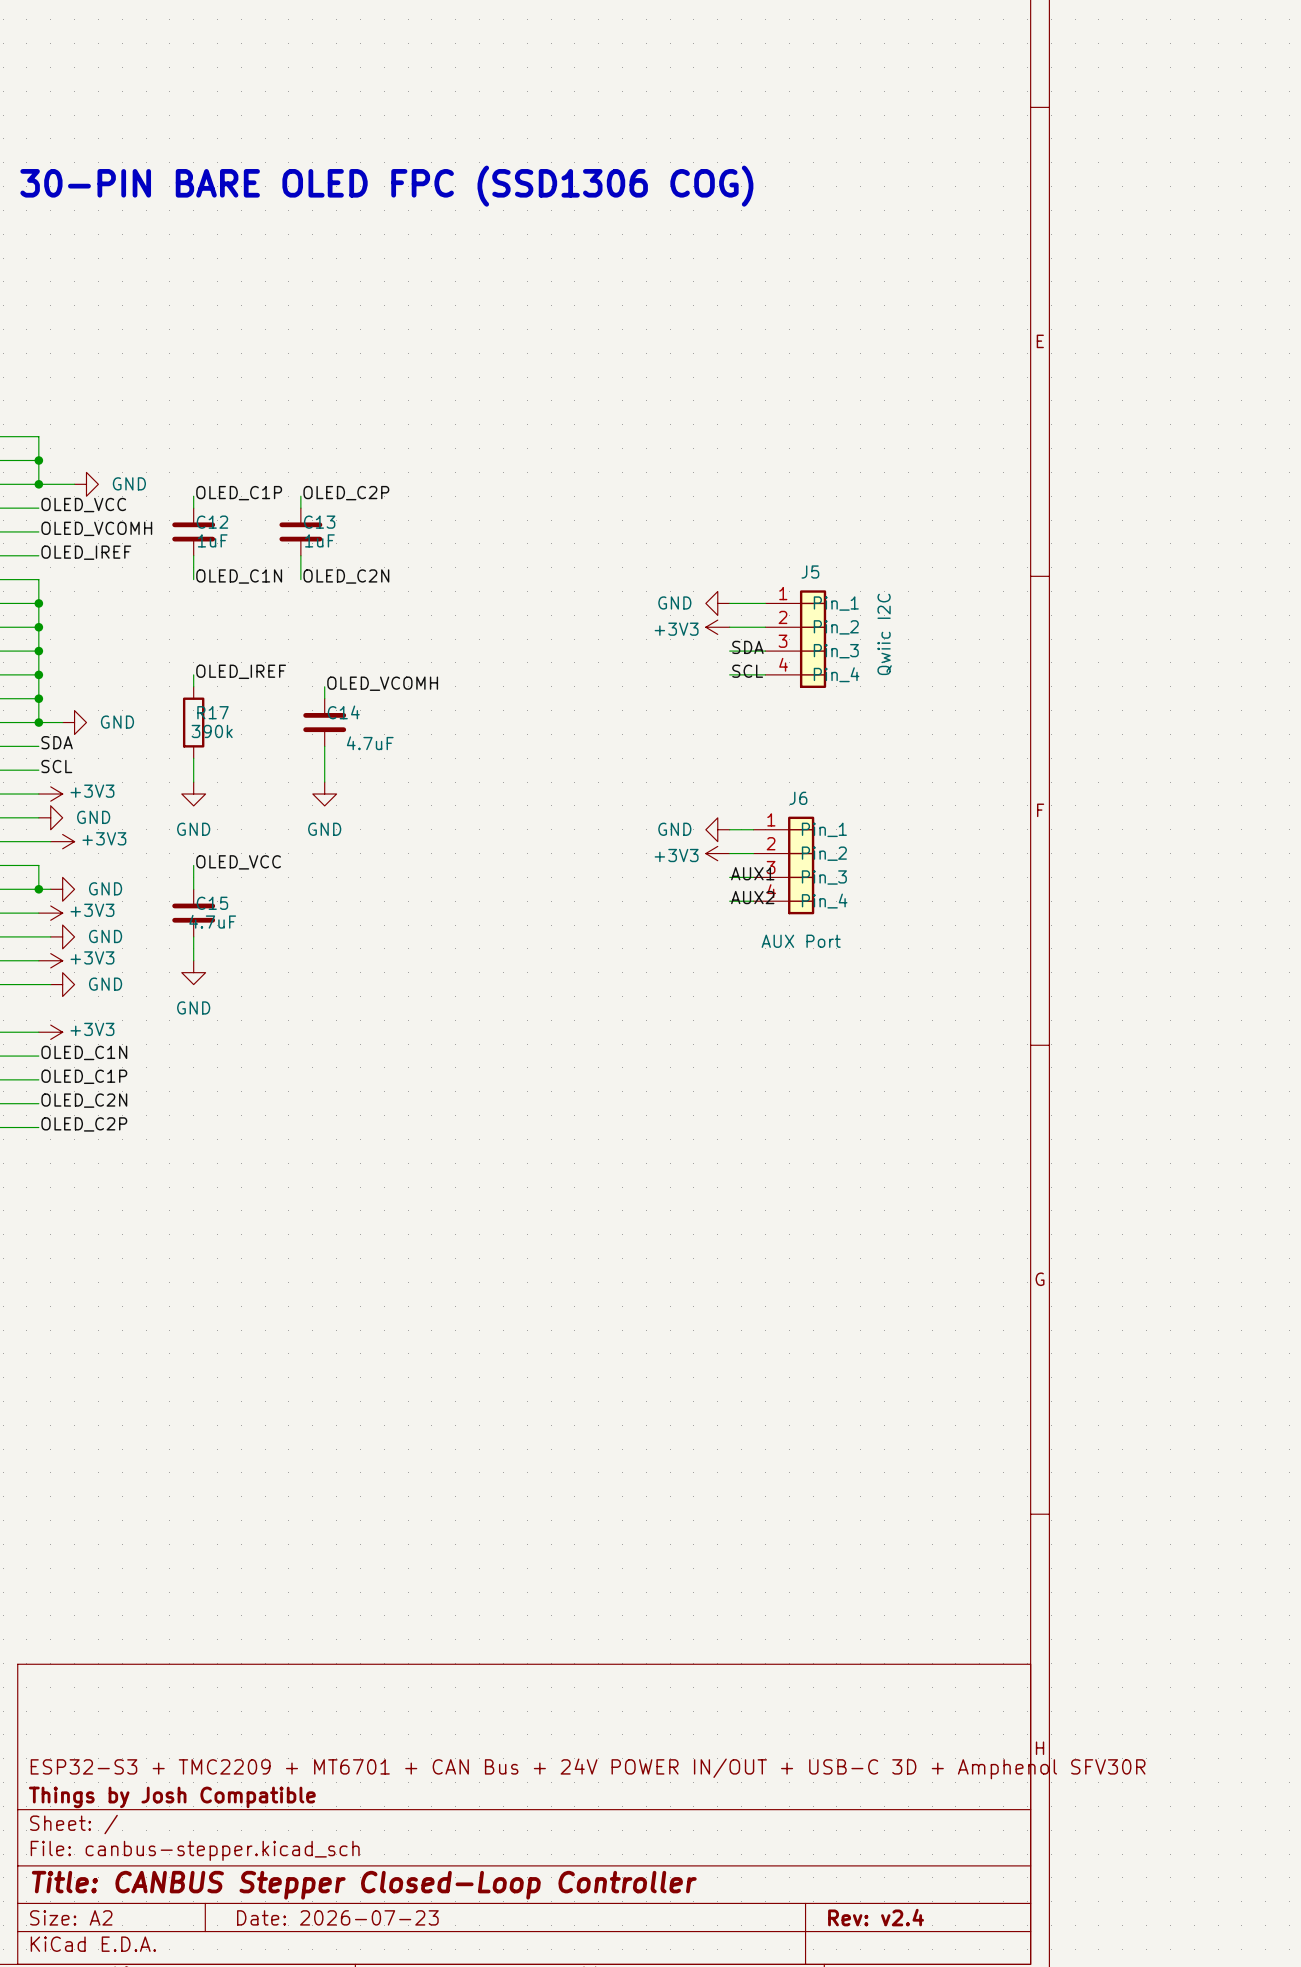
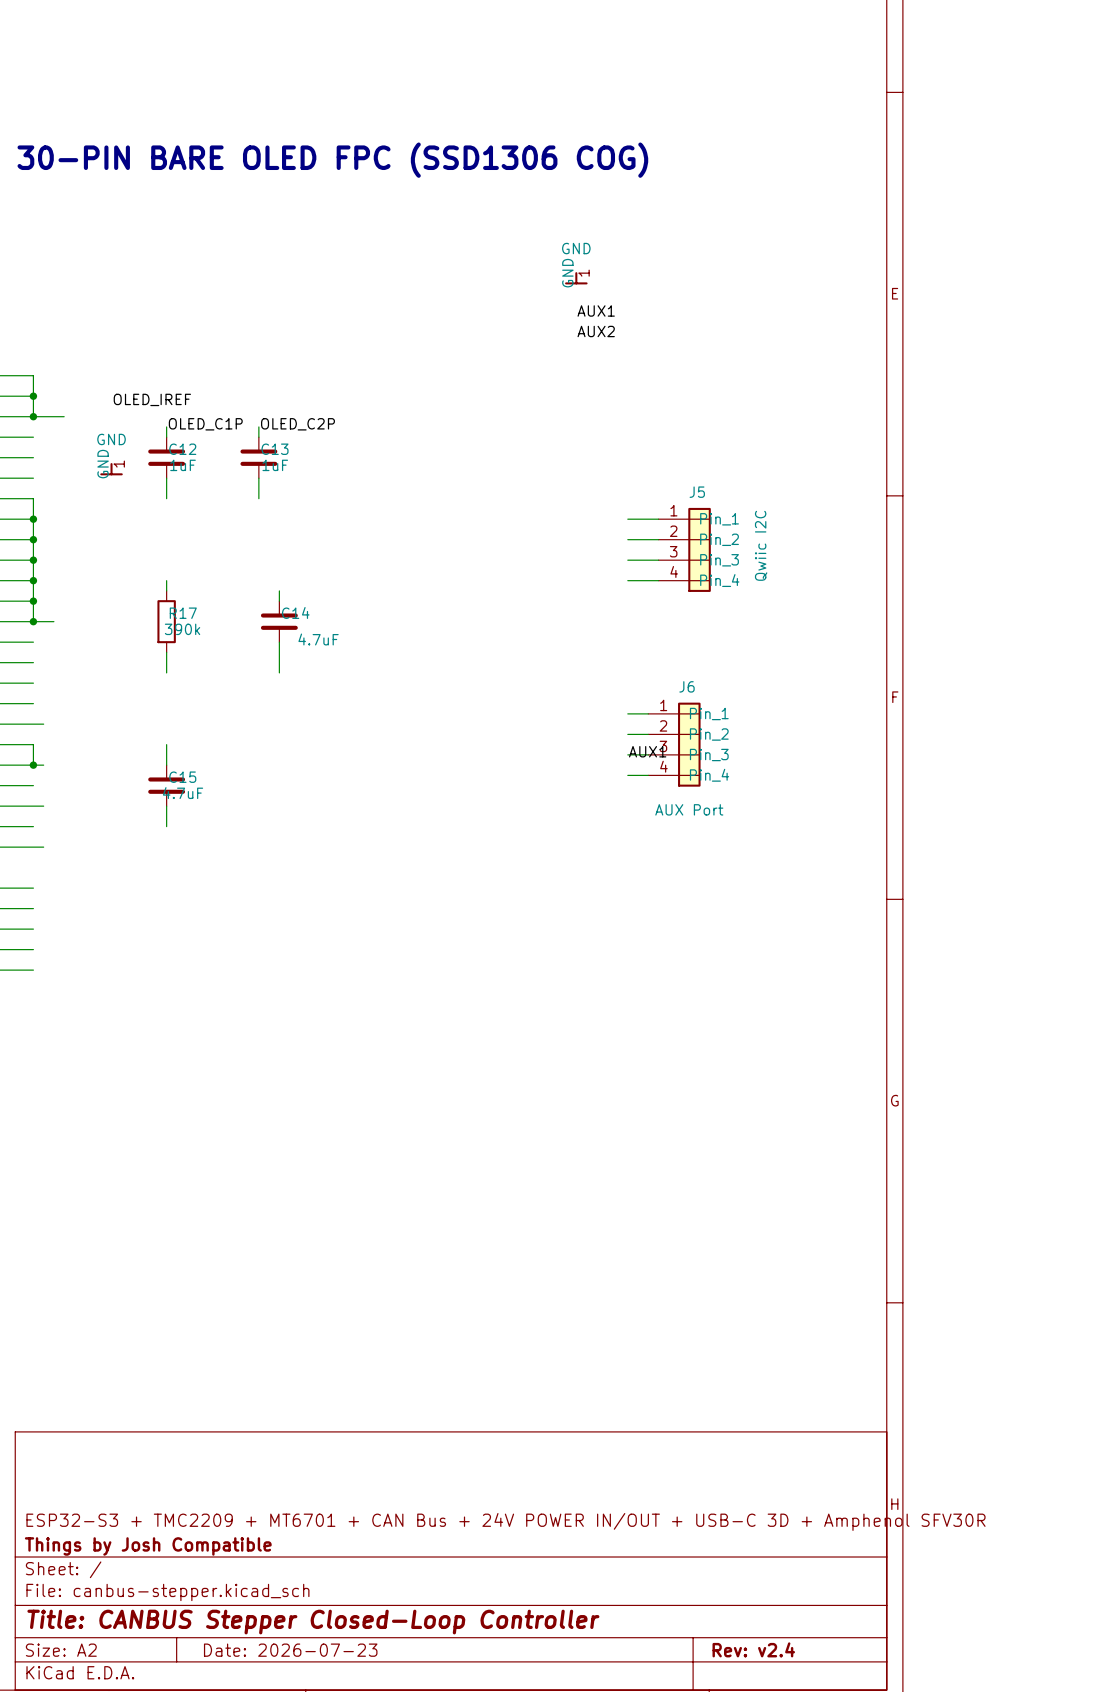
power symbol: none -> GND (576, 278)
label: none -> AUX1 (596, 310)
label: none -> AUX2 (596, 331)
label: none -> OLED_IREF (152, 399)
power symbol: GND (86, 484) -> none
label: OLED_VCC (83, 505) -> none
label: OLED_VCOMH (96, 528) -> none
power symbol: none -> GND (111, 469)
label: OLED_IREF (86, 552) -> none
label: OLED_C1N (239, 576) -> none
label: OLED_C2N (346, 576) -> none
power symbol: GND (717, 603) -> none
power symbol: +3V3 (717, 627) -> none
label: SDA (747, 647) -> none
label: OLED_IREF (241, 671) -> none
label: SCL (747, 671) -> none
label: OLED_VCOMH (382, 683) -> none
power symbol: GND (74, 722) -> none
label: SDA (57, 742) -> none
label: SCL (56, 766) -> none
power symbol: +3V3 (50, 794) -> none
power symbol: GND (193, 794) -> none
power symbol: GND (324, 794) -> none
power symbol: GND (50, 817) -> none
power symbol: GND (717, 829) -> none
power symbol: +3V3 (62, 841) -> none
power symbol: +3V3 (717, 853) -> none
label: OLED_VCC (238, 862) -> none
power symbol: GND (62, 889) -> none
label: AUX2 (752, 897) -> none
power symbol: +3V3 (50, 913) -> none
power symbol: GND (62, 936) -> none
power symbol: +3V3 (50, 960) -> none
power symbol: GND (193, 972) -> none
power symbol: GND (62, 984) -> none
power symbol: +3V3 (50, 1032) -> none
label: OLED_C1N (84, 1052) -> none
label: OLED_C1P (84, 1076) -> none
label: OLED_C2N (84, 1100) -> none
label: OLED_C2P (84, 1124) -> none

